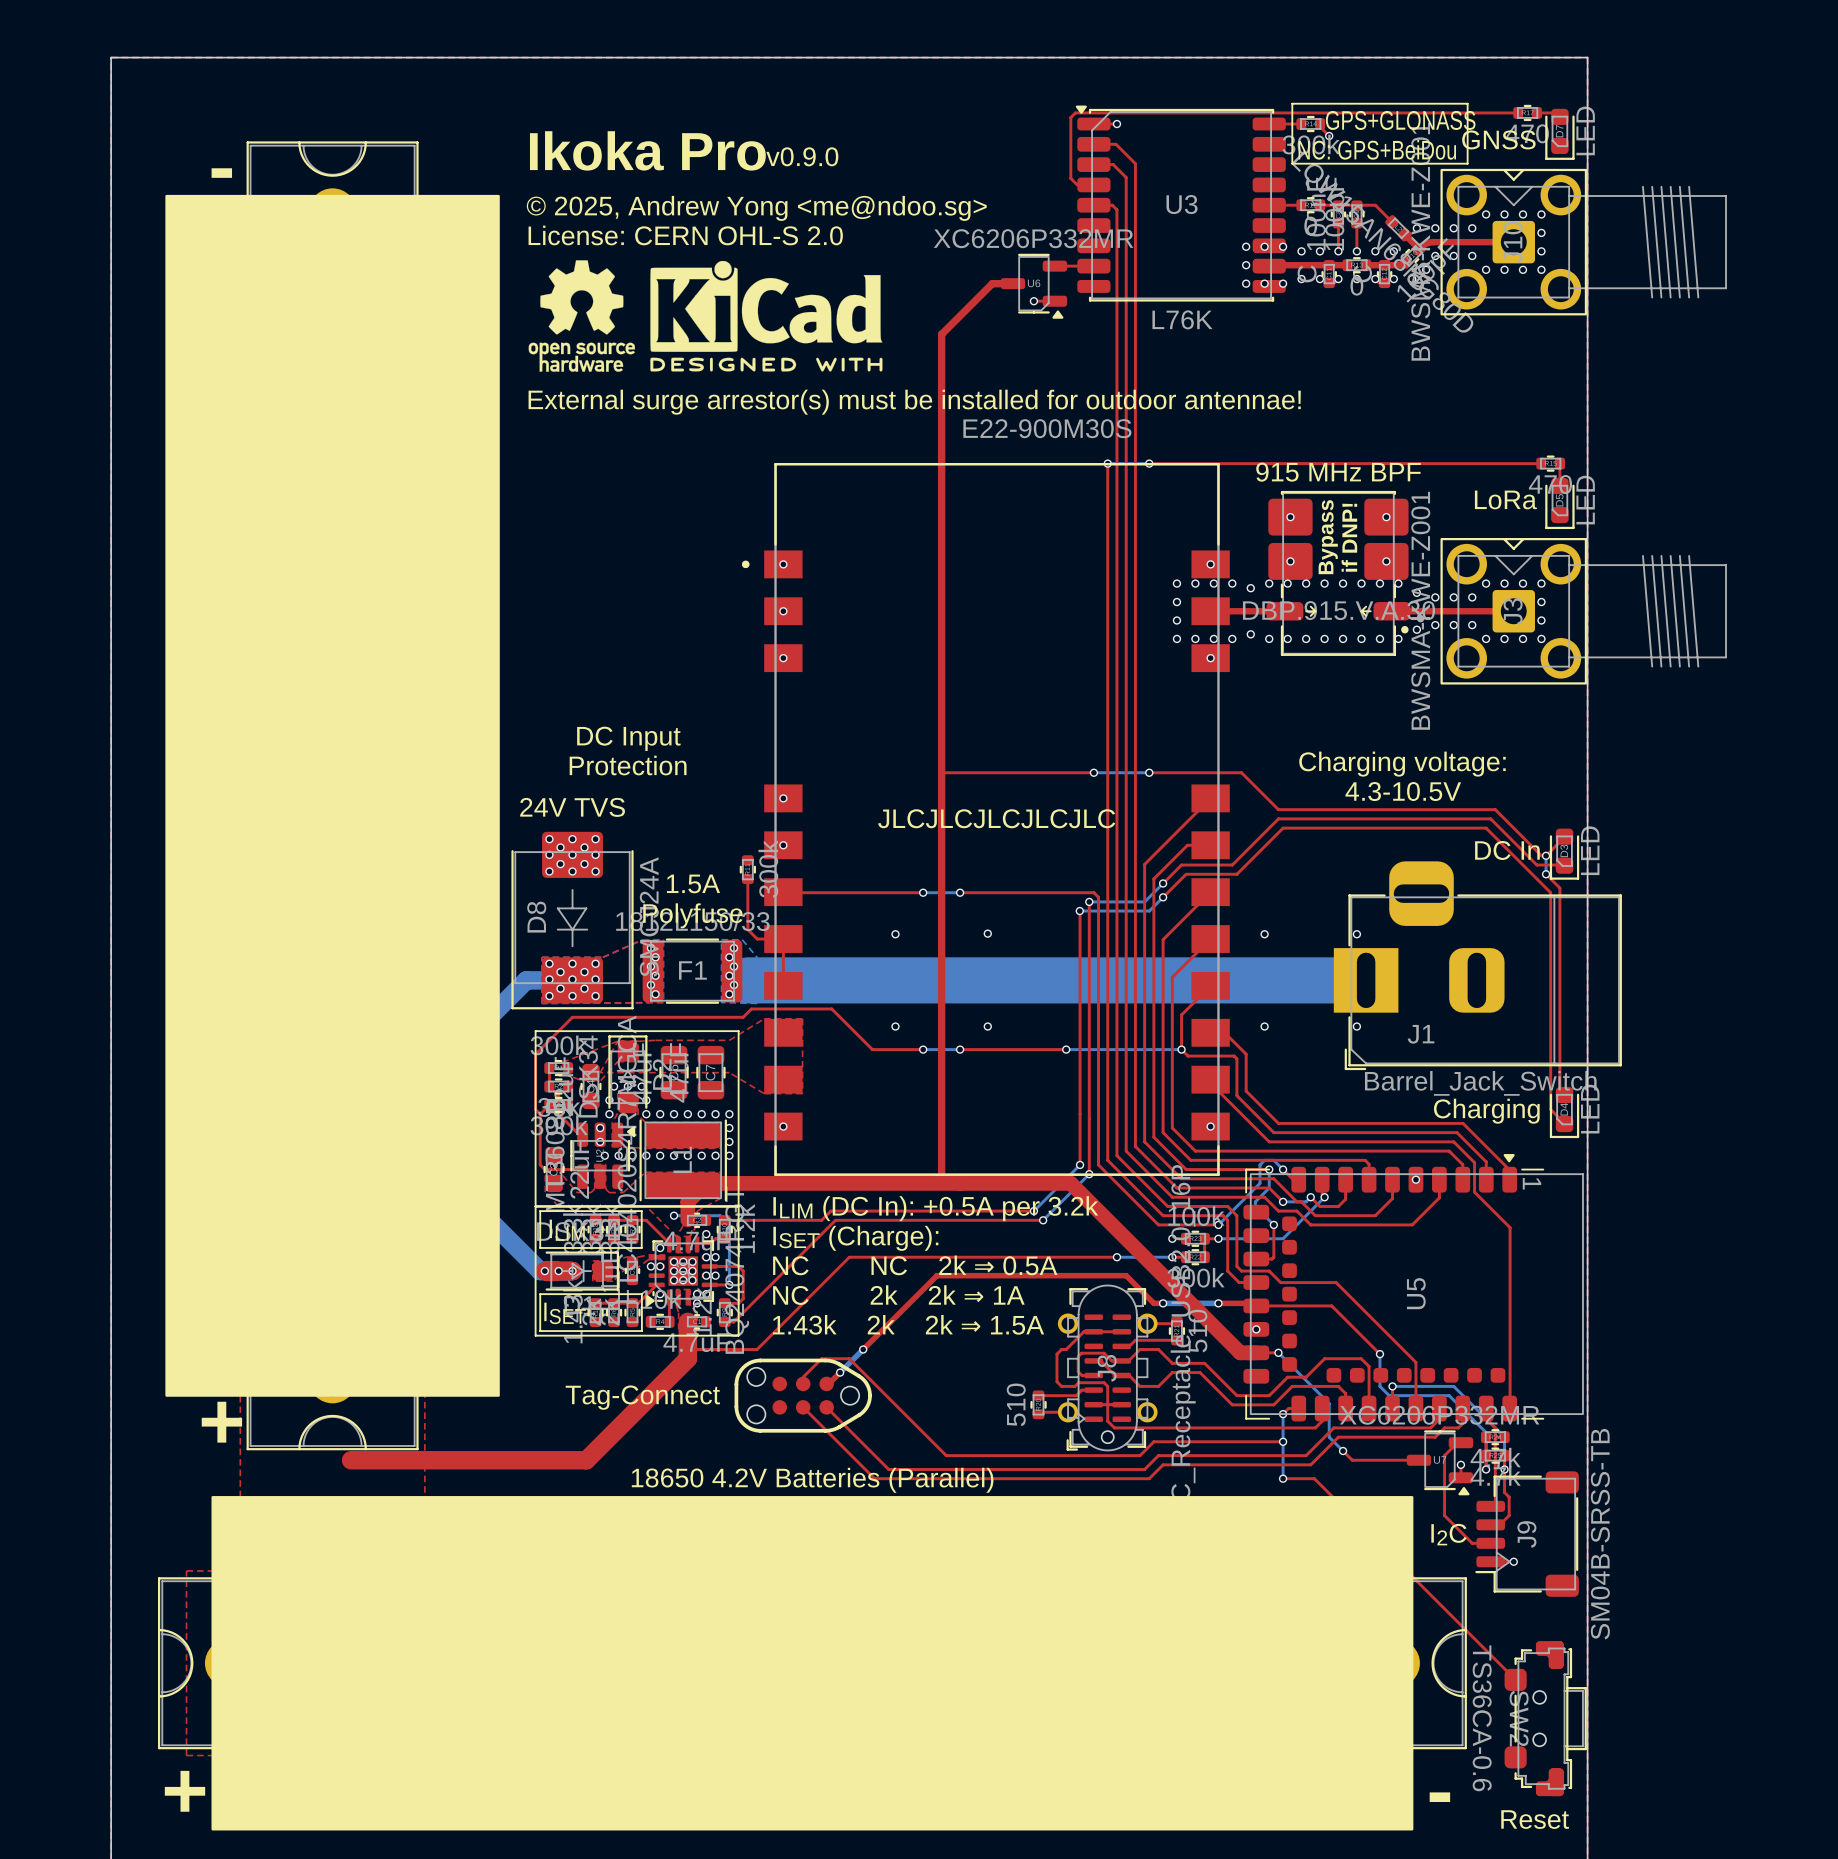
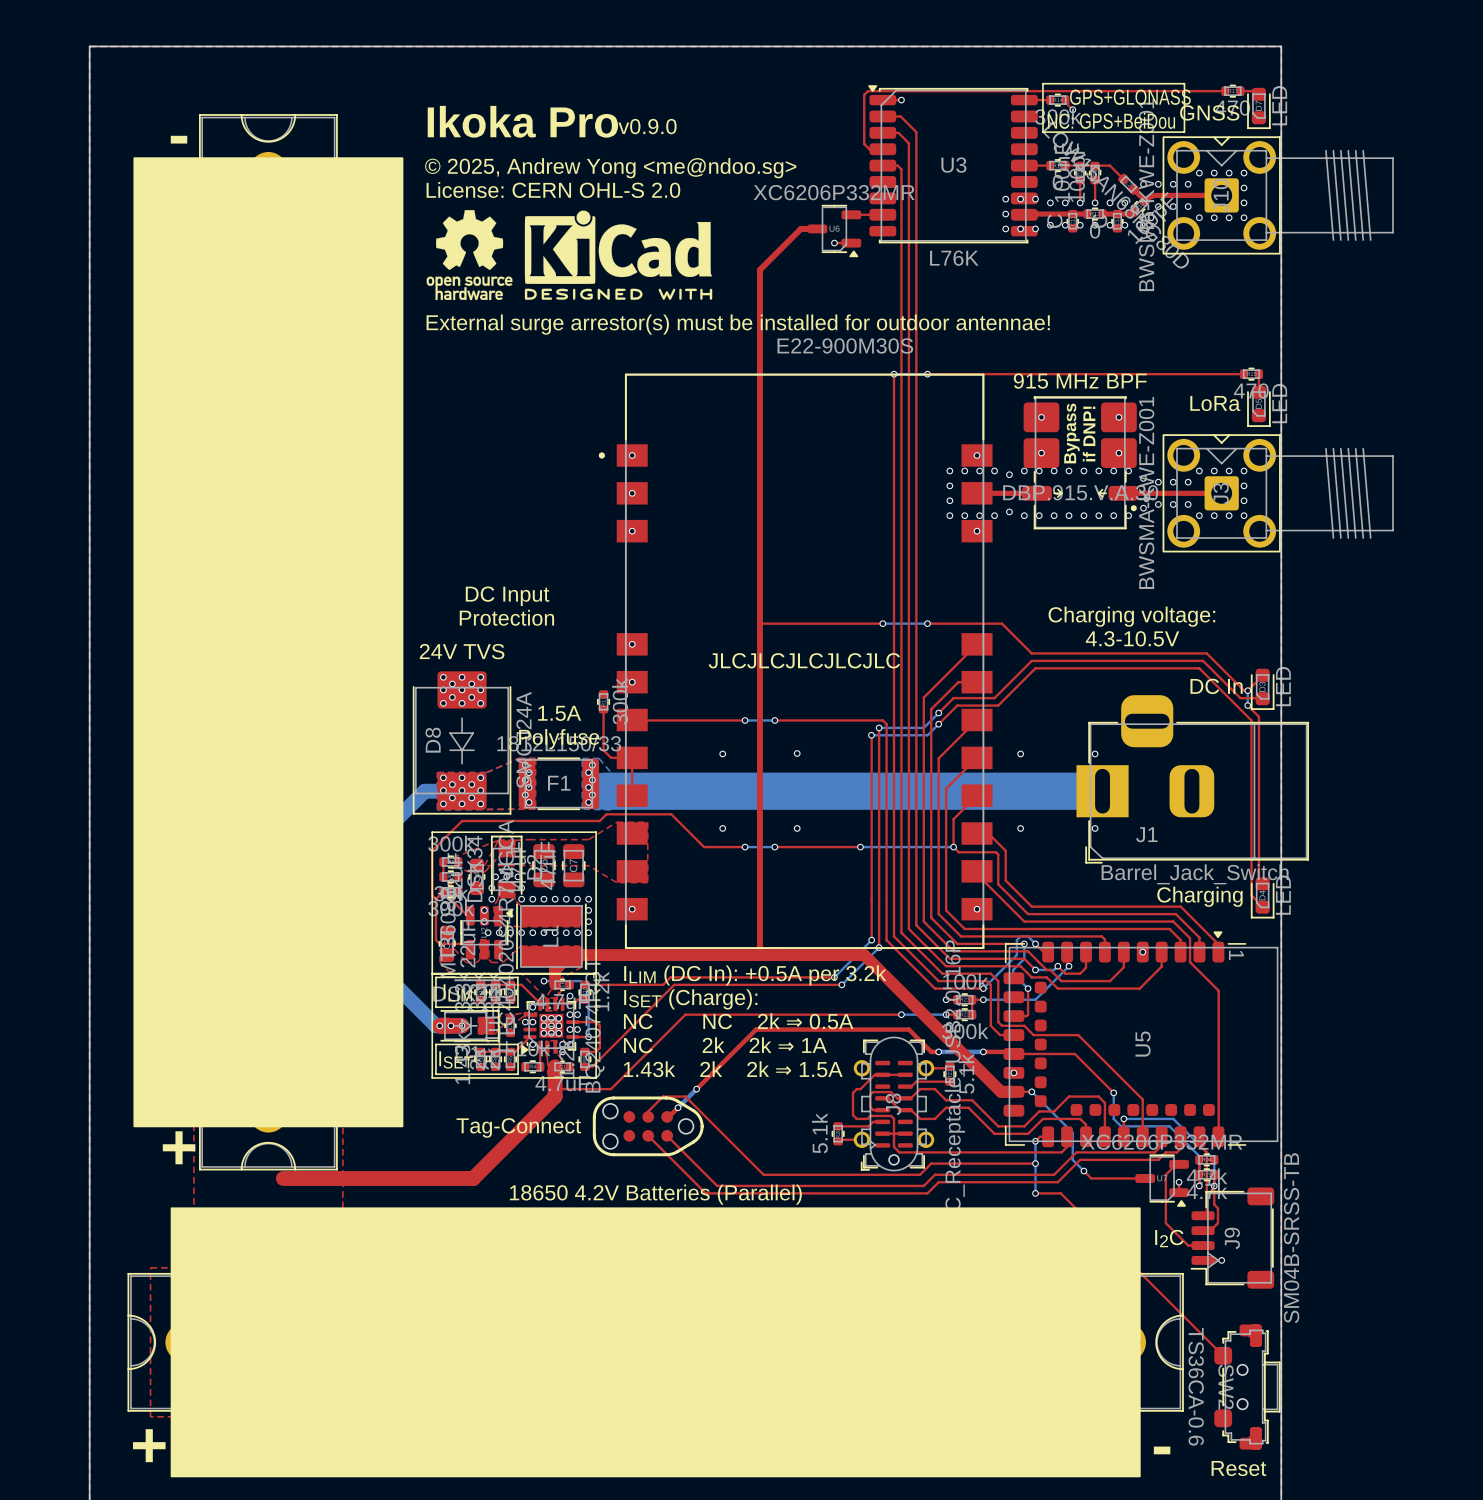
part value: 510 (1197, 1331) -> 5.1k (966, 1073)
part value: 510 (1016, 1404) -> 5.1k (819, 1133)

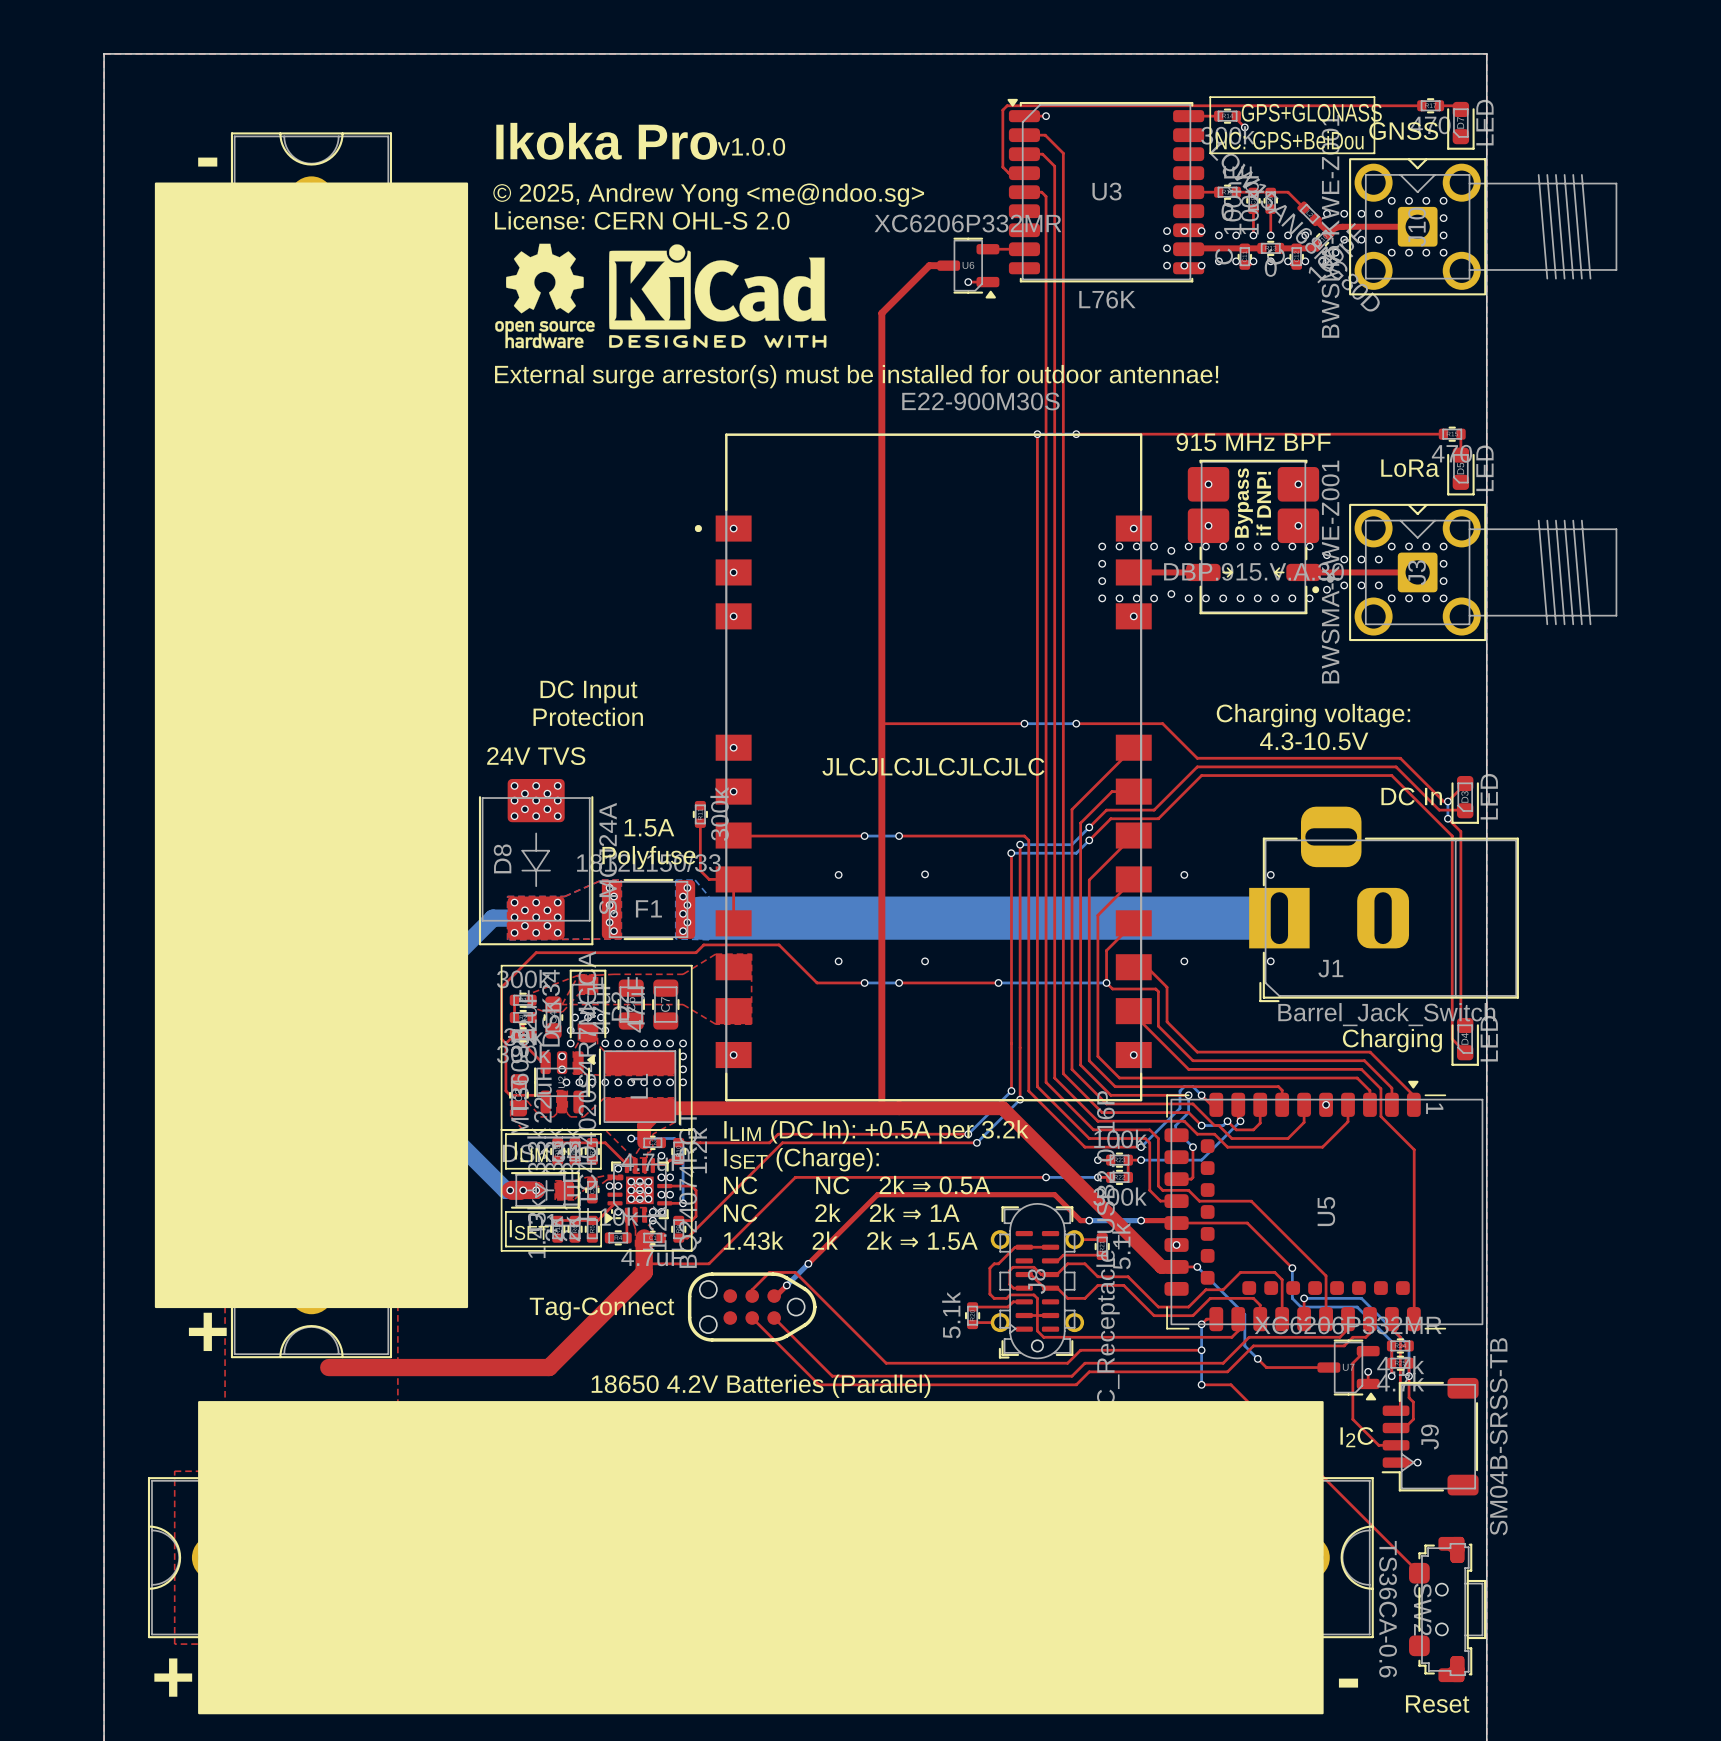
text: v0.9.0 (647, 126) -> v1.0.0 (751, 146)

